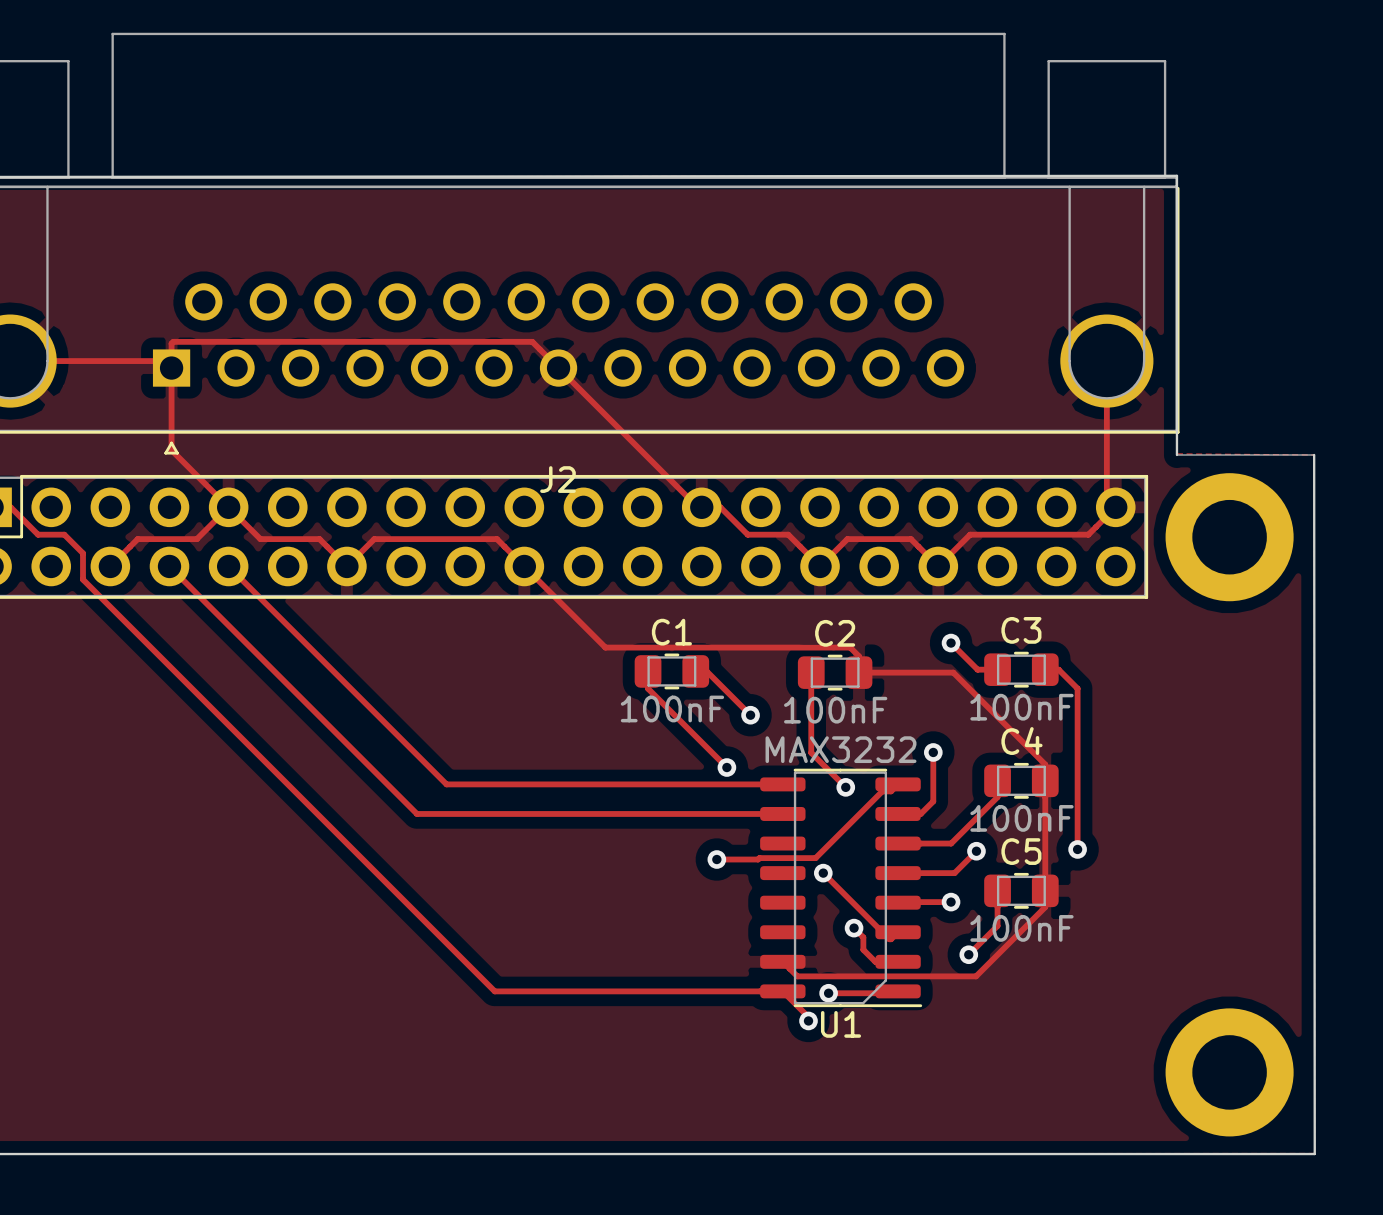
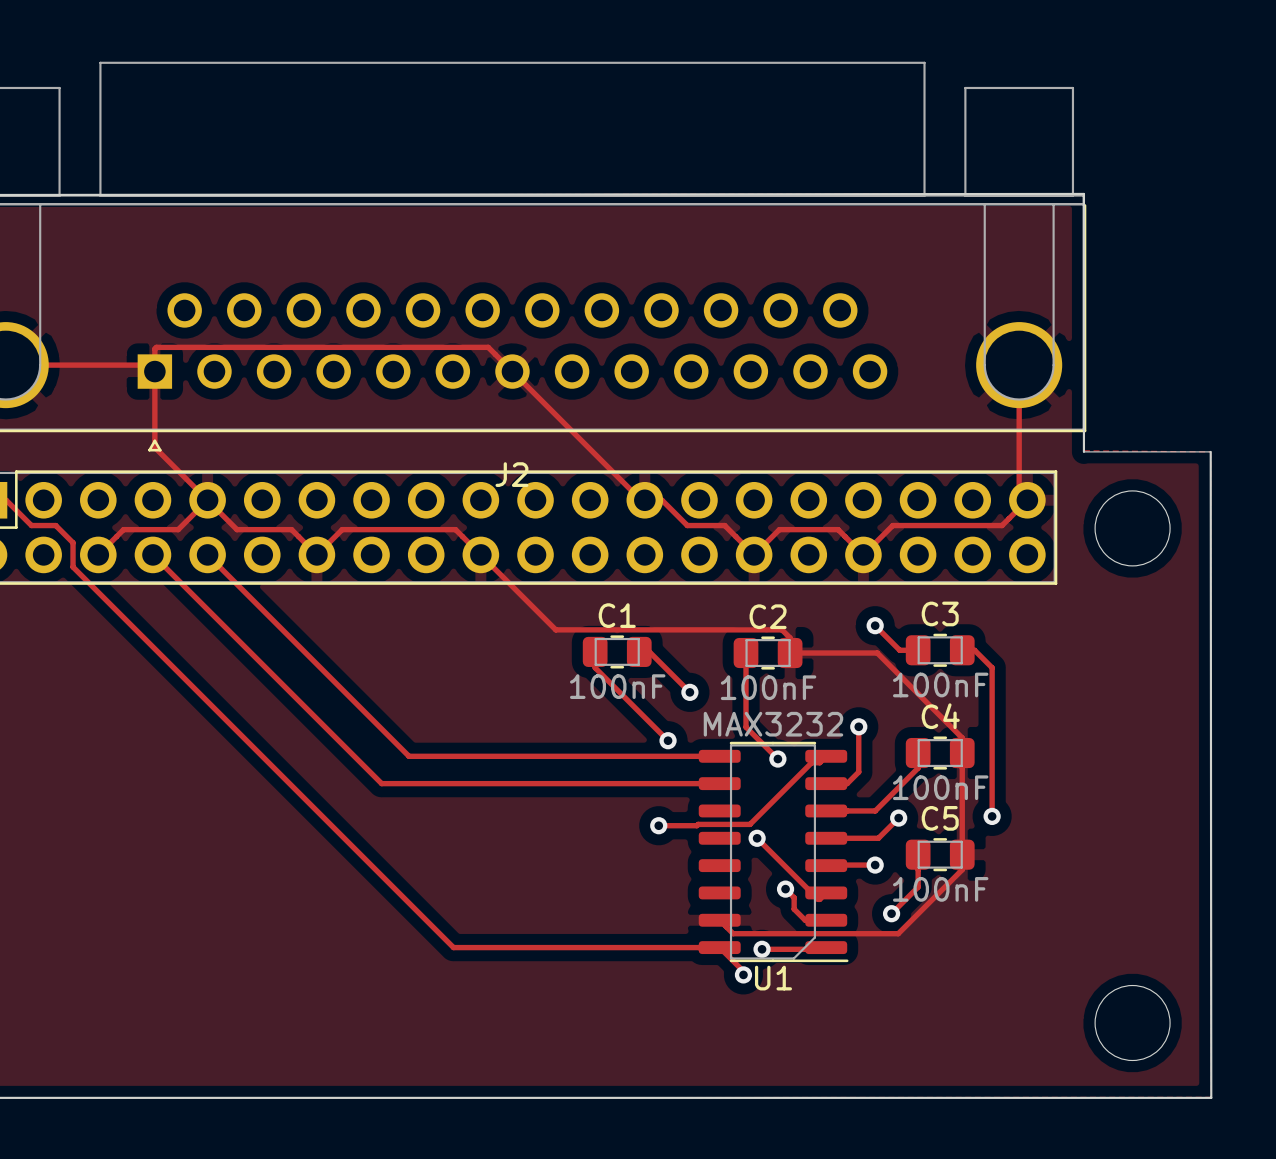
round board edge: none -> [1094, 490, 1171, 567]
part: (1229, 537) -> none
round board edge: none -> [1094, 984, 1171, 1062]
part: (1229, 1072) -> none

